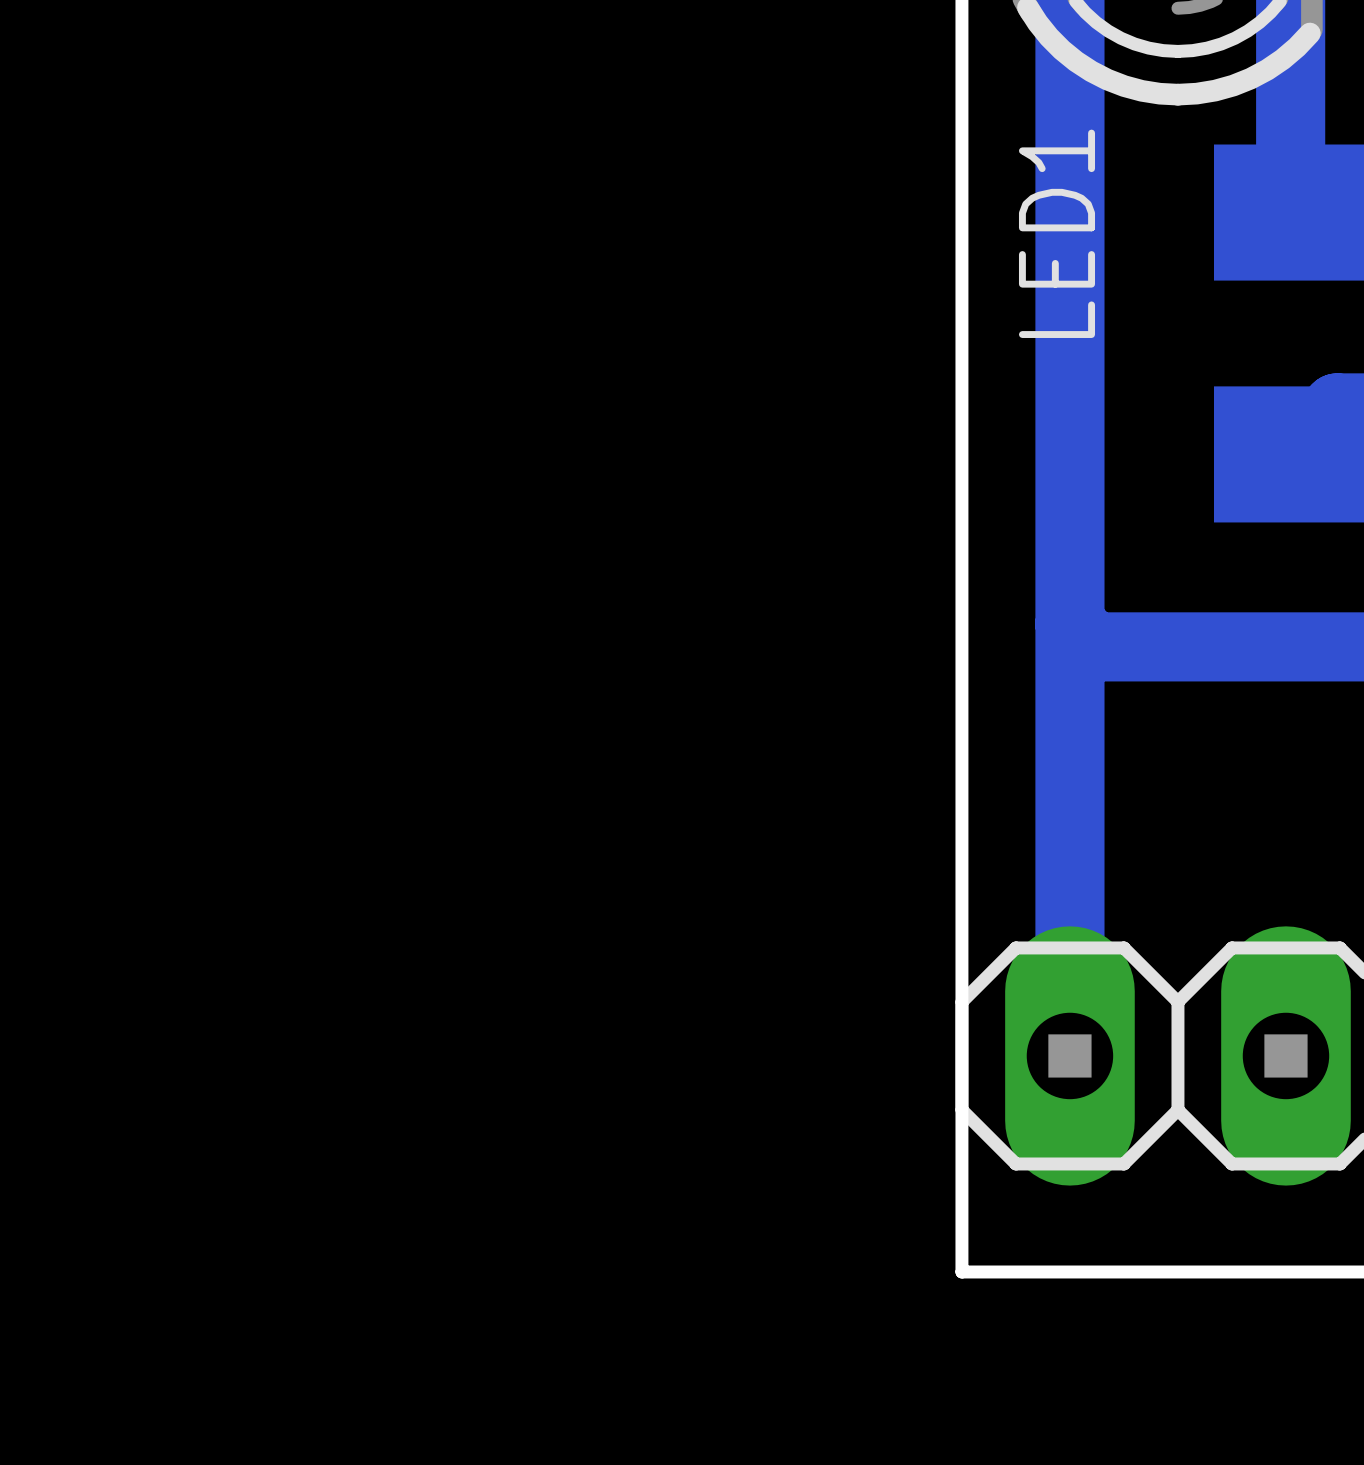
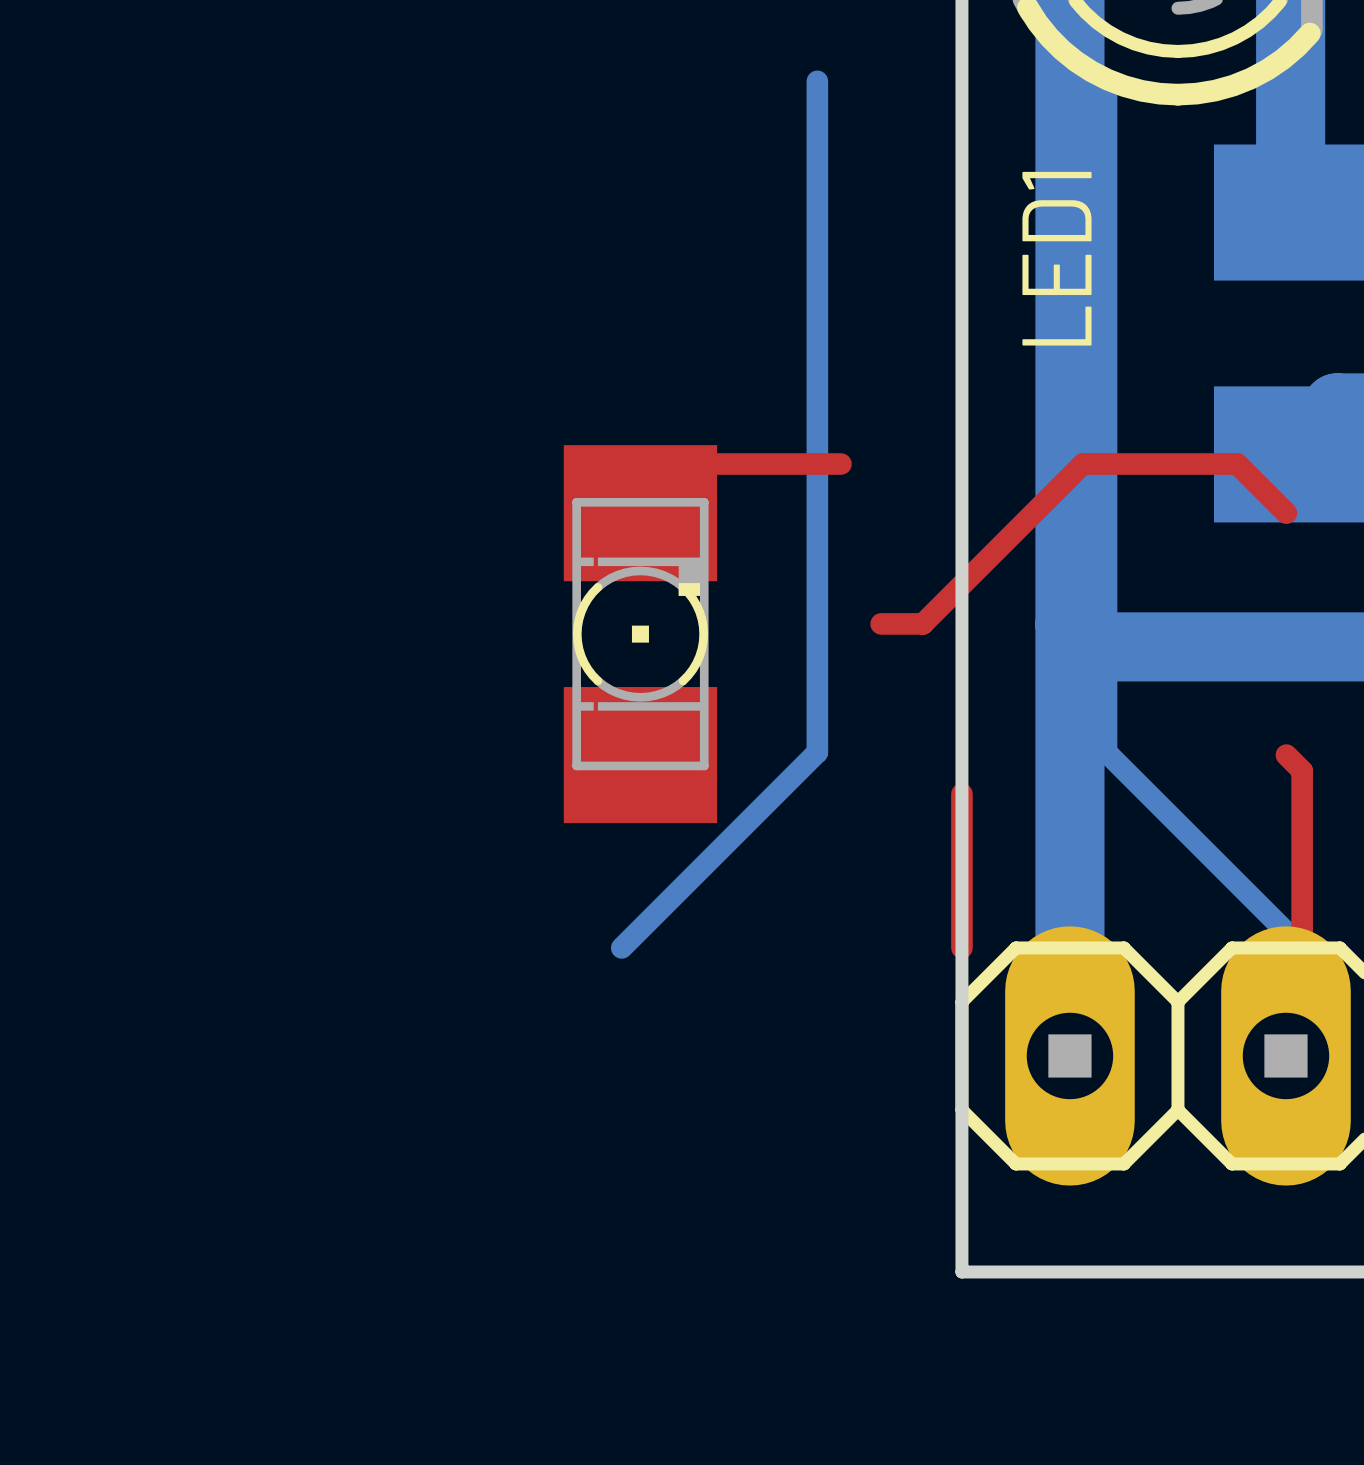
bottom track: none -> (817, 81) (817, 752) (621, 947)
bottom track: none -> (1106, 81) (1106, 752) (1302, 947)
top track: none -> (841, 464) (689, 464) (640, 513)
top track: none -> (1286, 513) (1237, 464) (1082, 464) (922, 623) (881, 623)
part: none -> (640, 634)
top track: none -> (1286, 755) (1302, 770) (1302, 947)
top track: none -> (961, 794) (961, 947)

